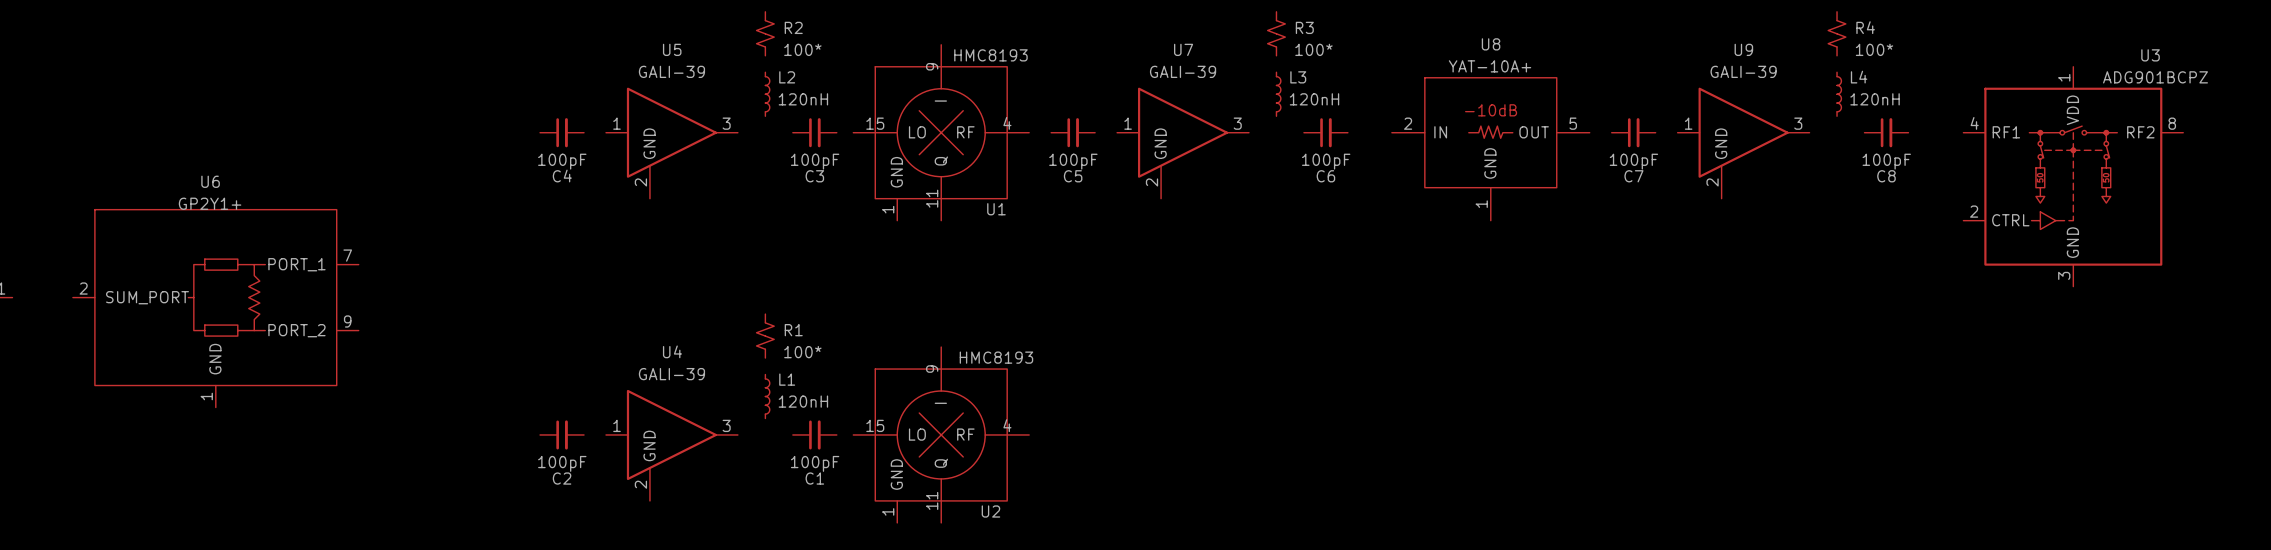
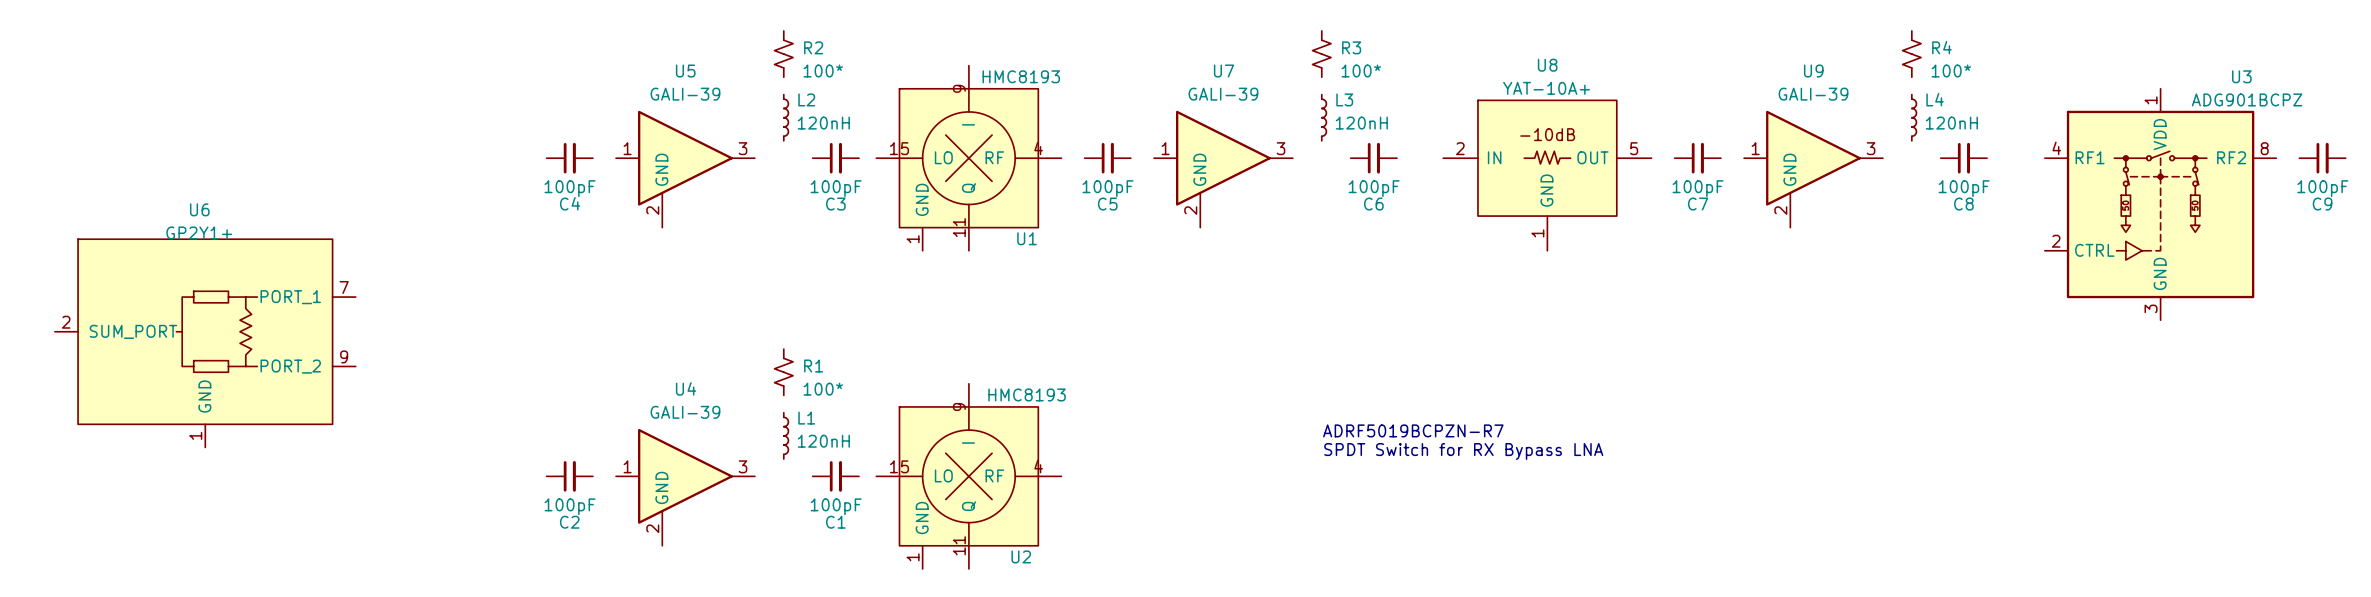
C9: none -> 100pF (2322, 158)
text: none -> ADRF5019BCPZN-R7 (1413, 430)
text: none -> SPDT Switch for RX Bypass LNA (1463, 451)

